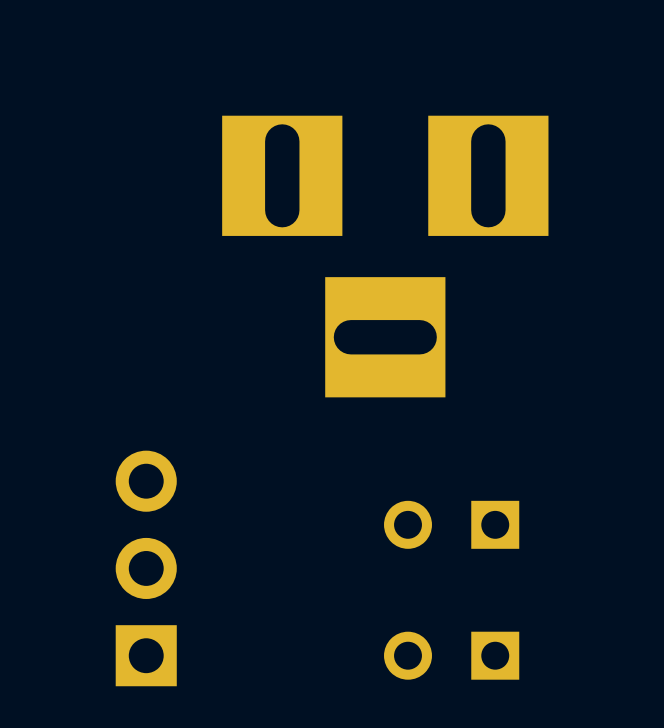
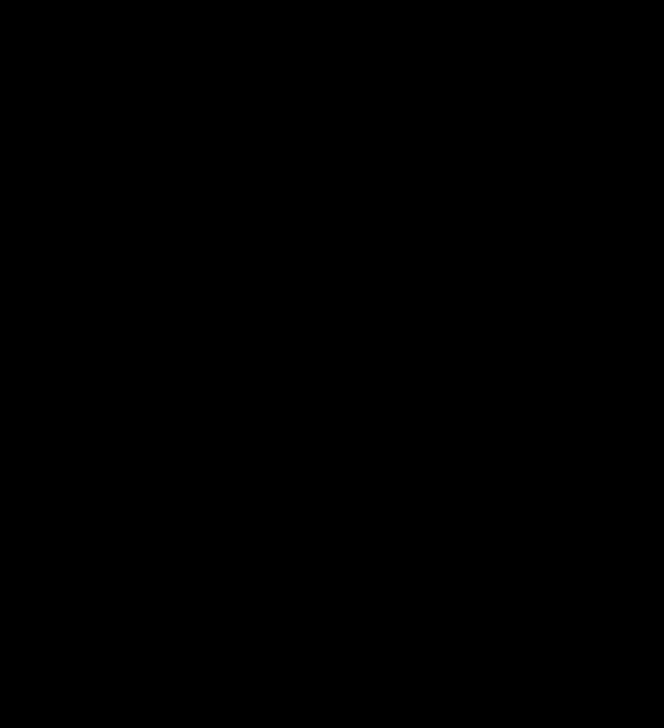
part: (385, 256) -> none
part: (451, 524) -> none
part: (146, 568) -> none
part: (451, 655) -> none

